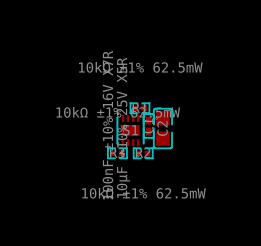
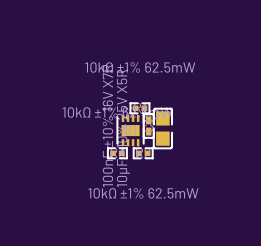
C2 name: C2 (162, 128) -> none

